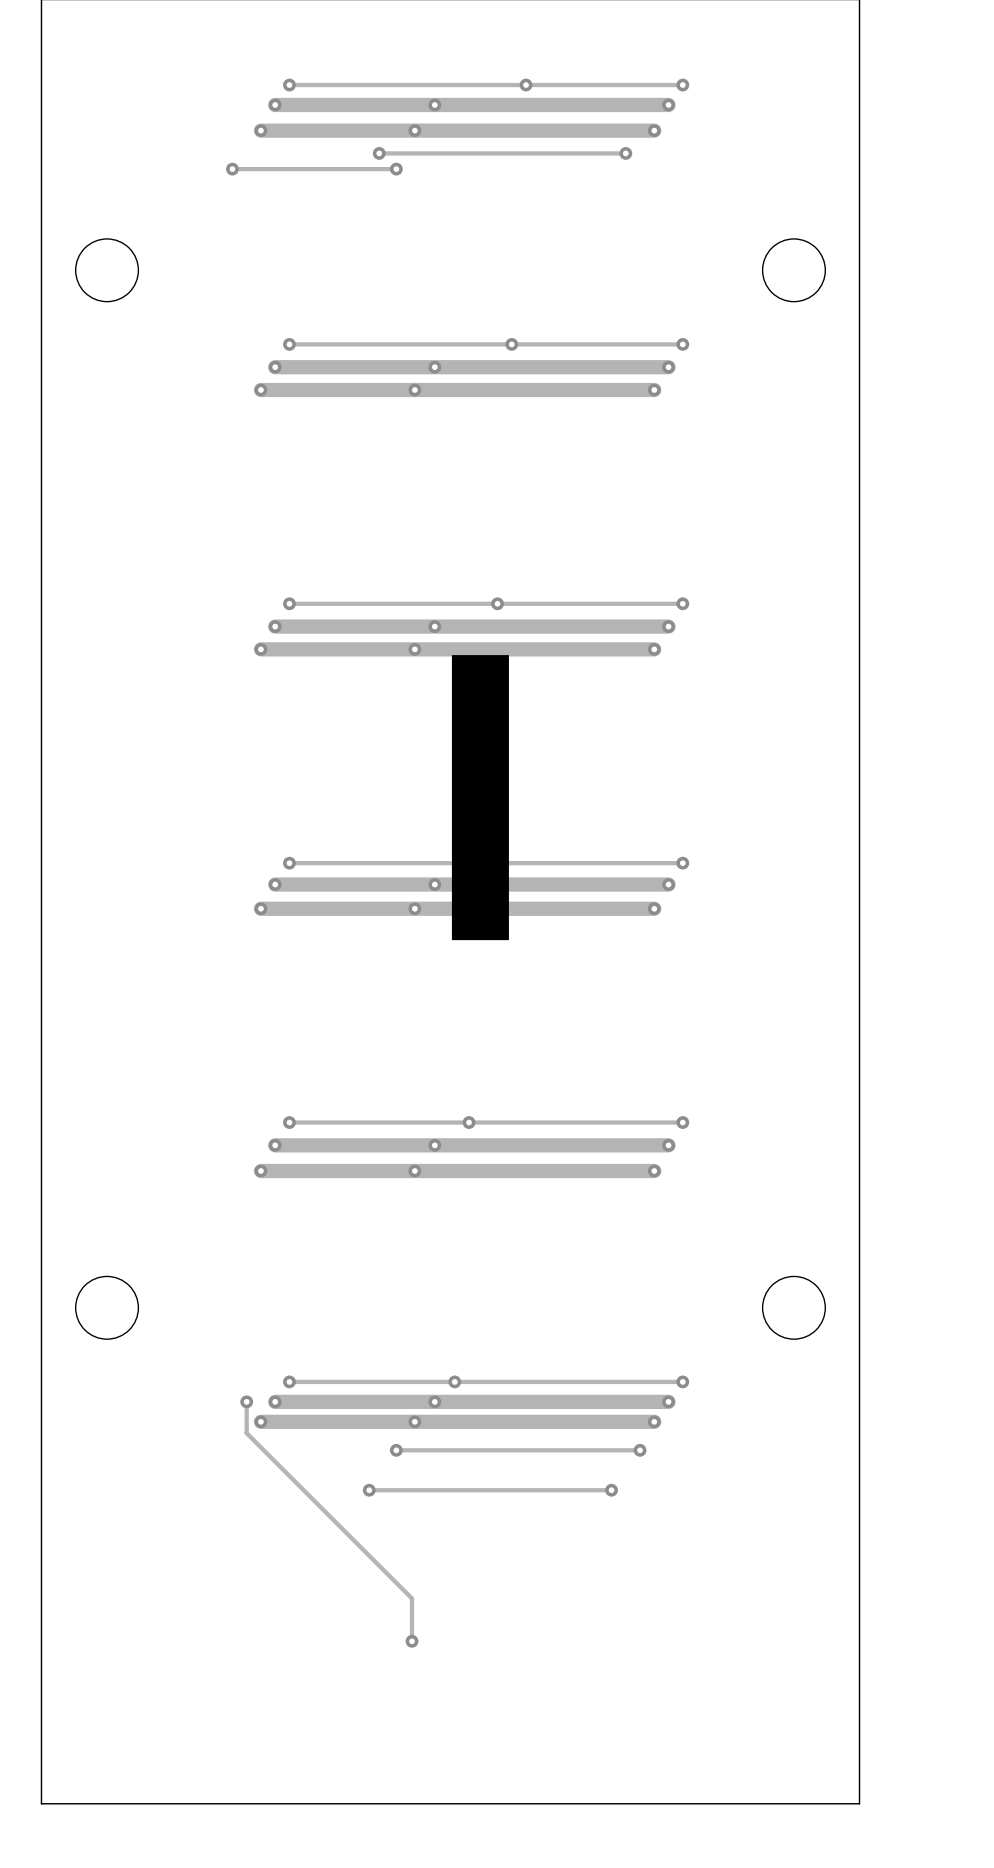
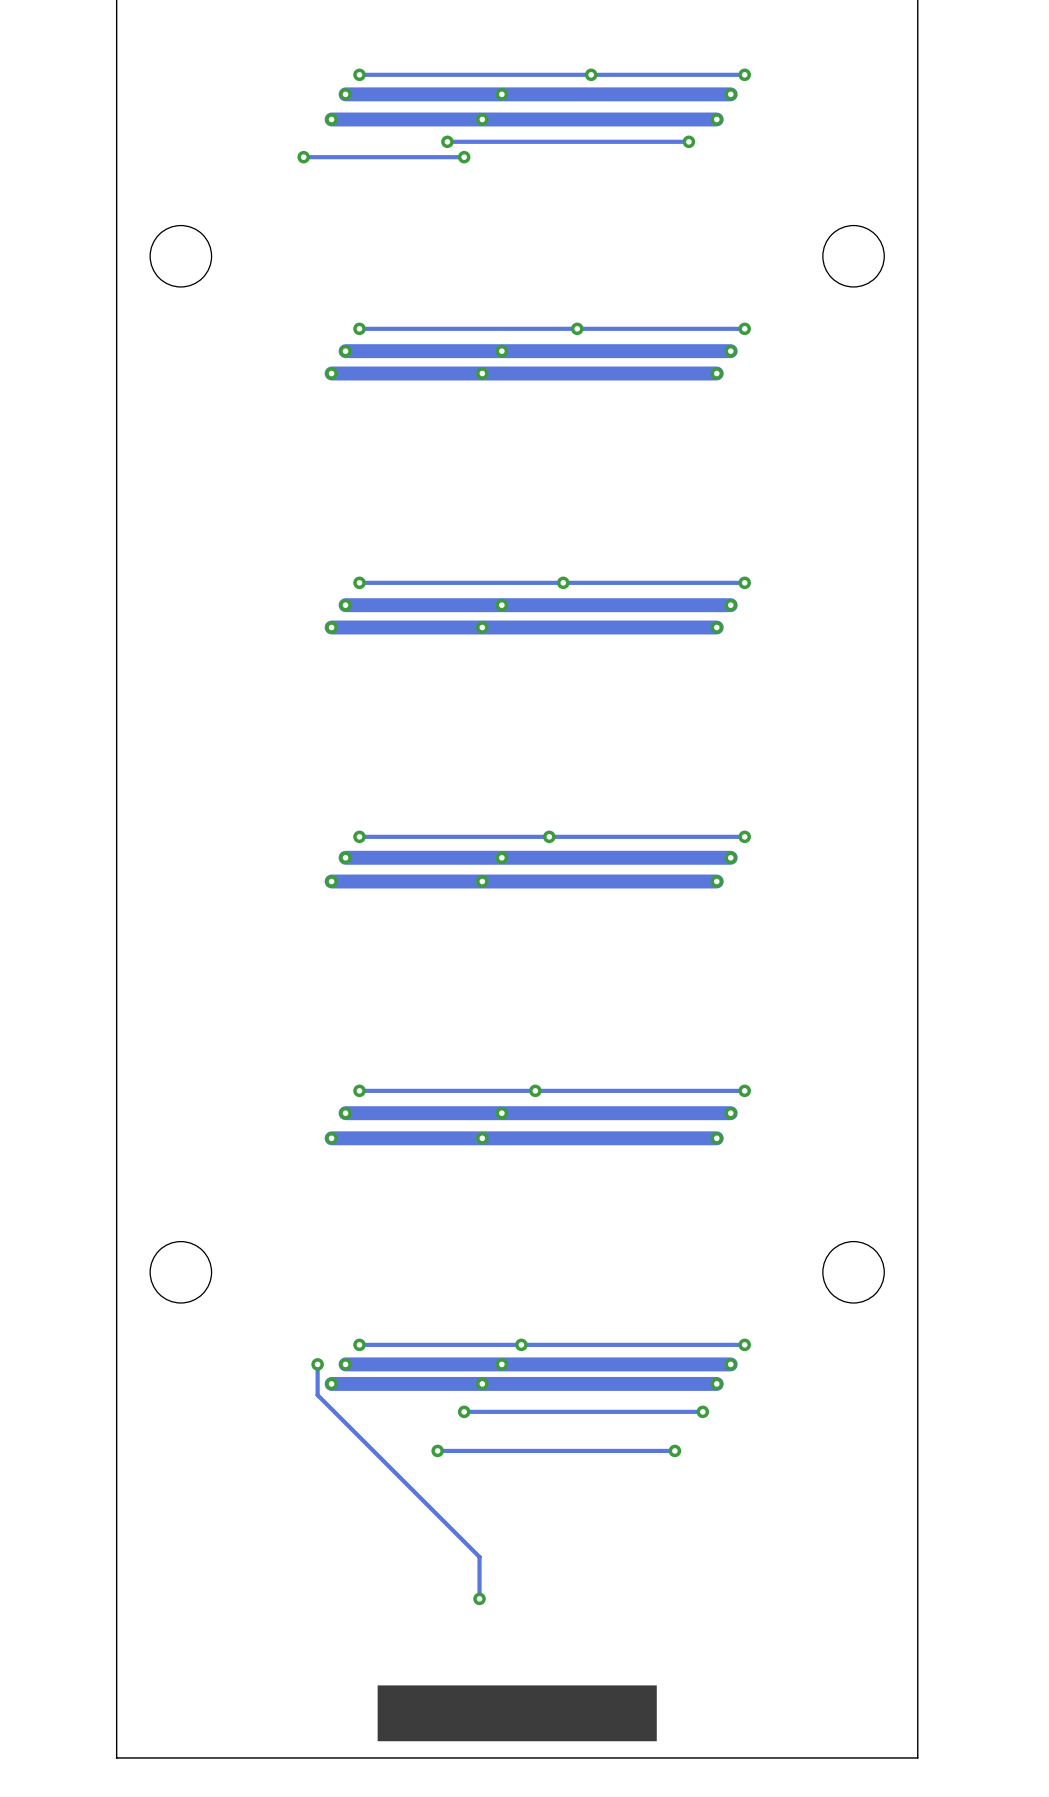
drawing: [451, 655, 509, 941] -> none
drawing: none -> [377, 1685, 657, 1742]

